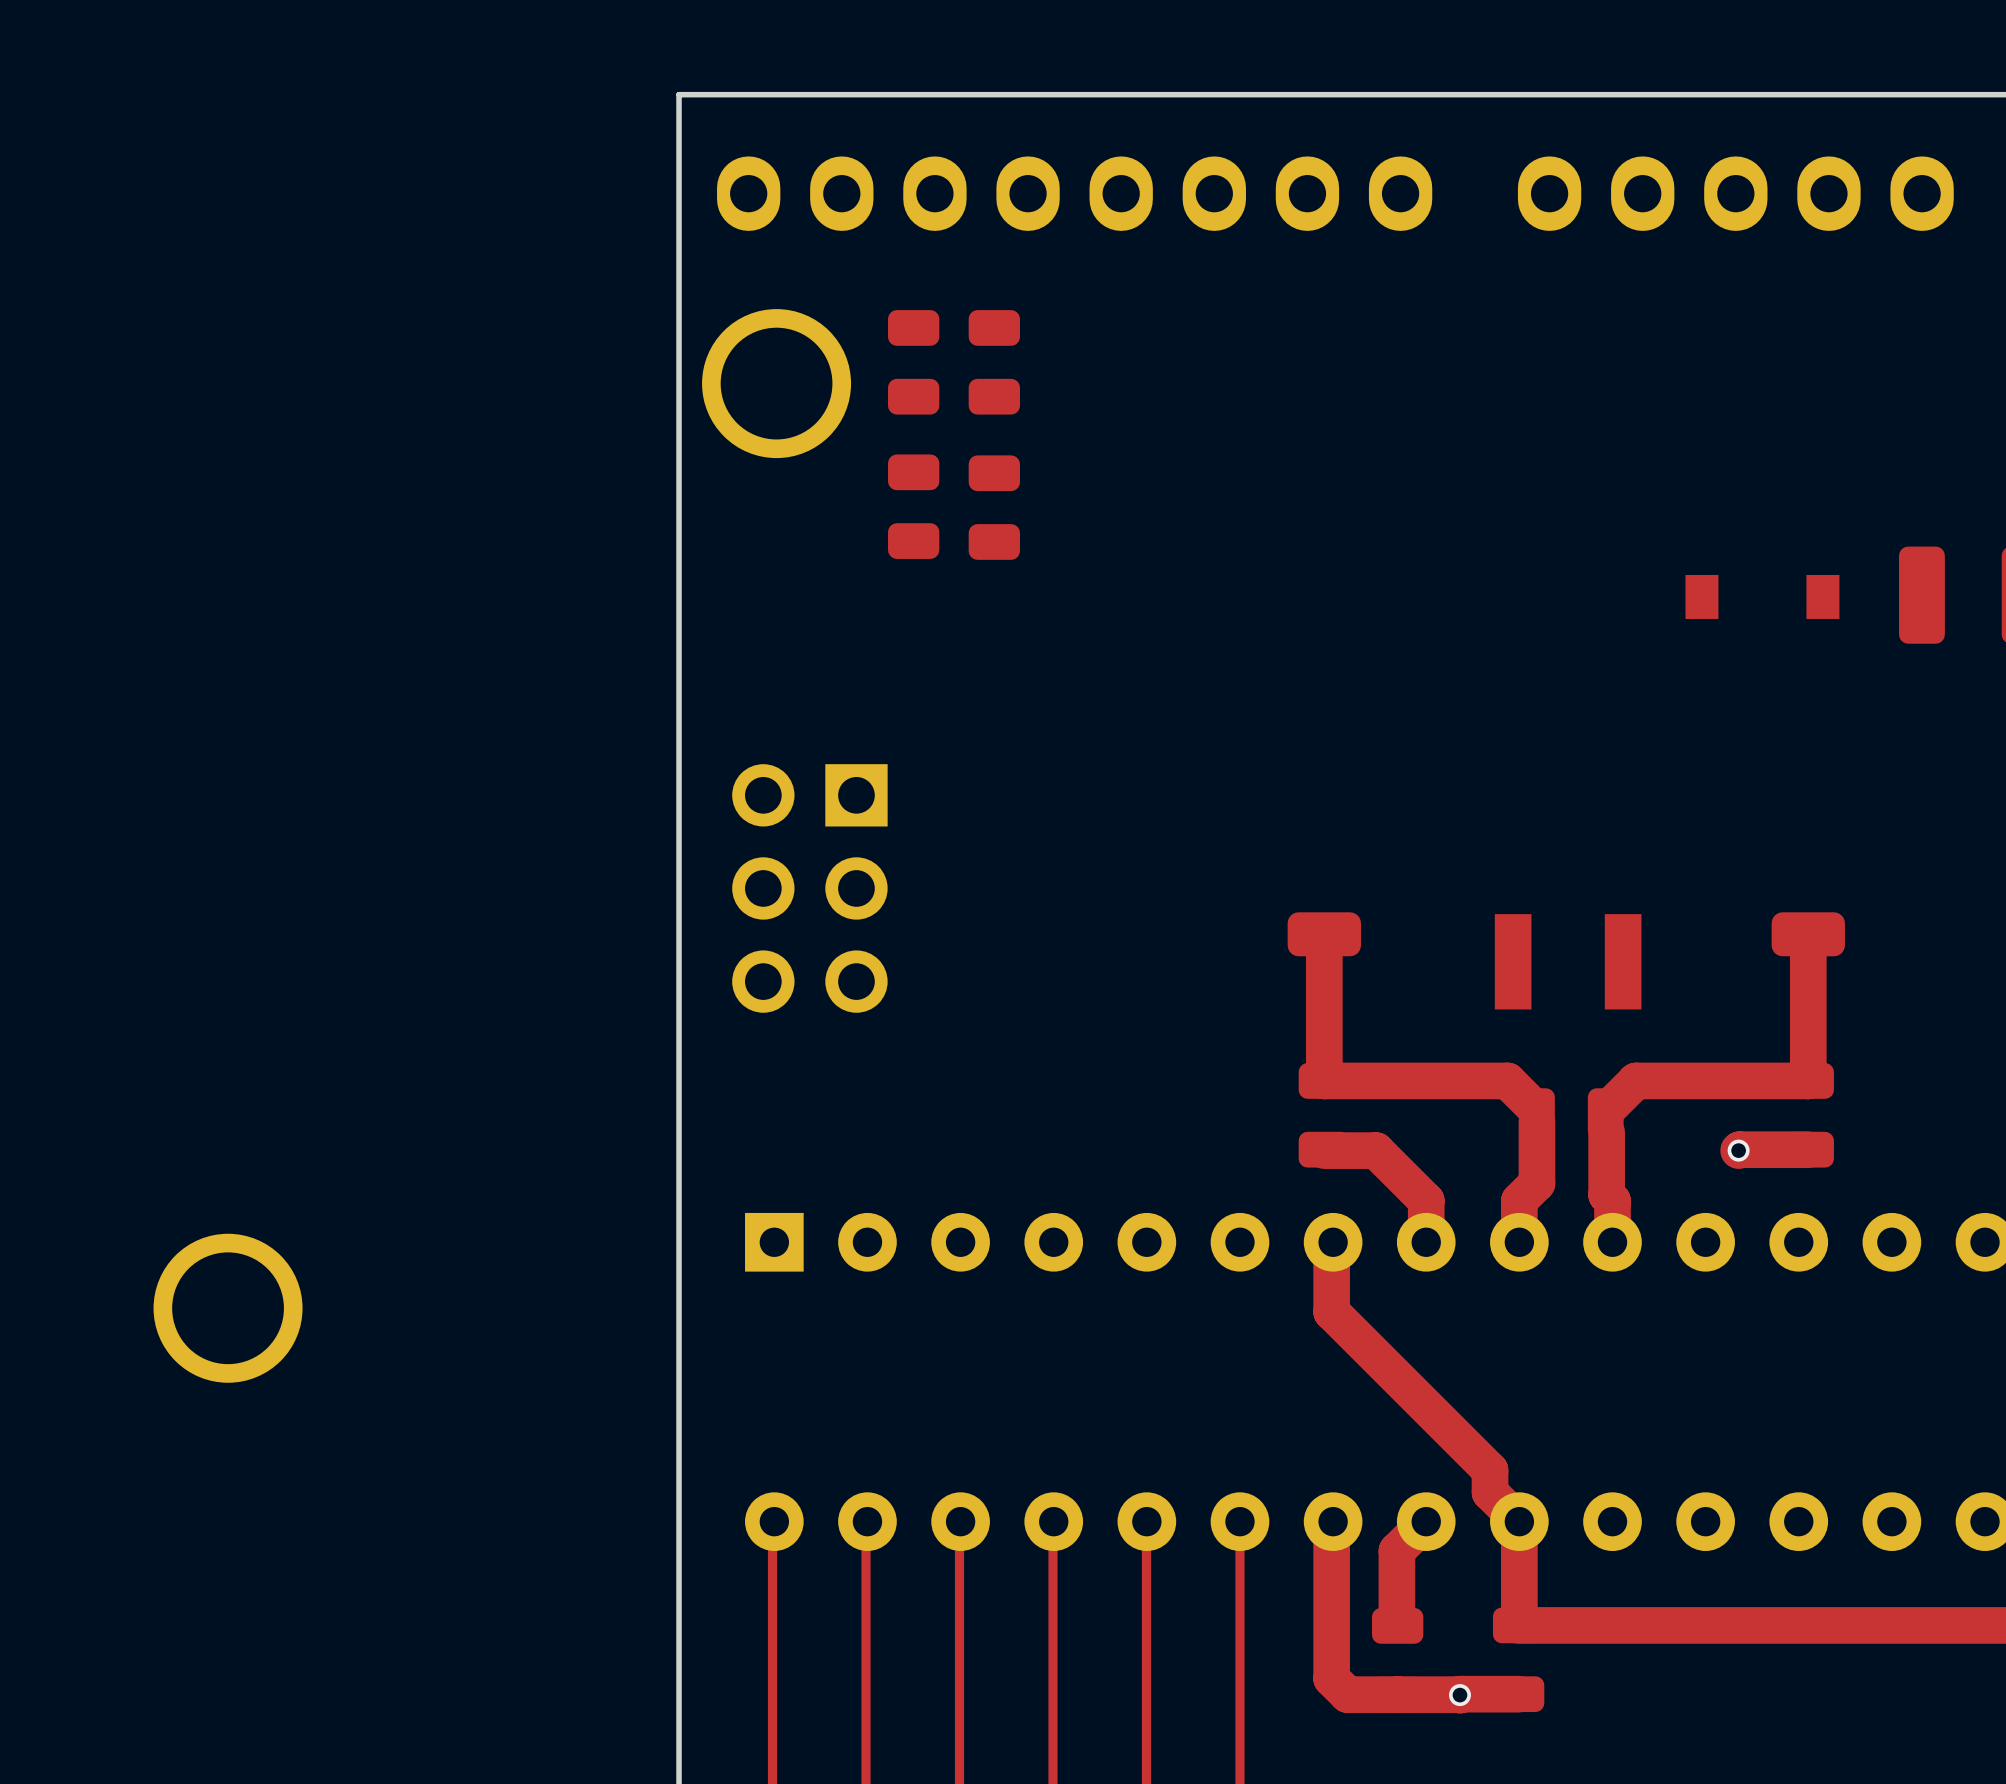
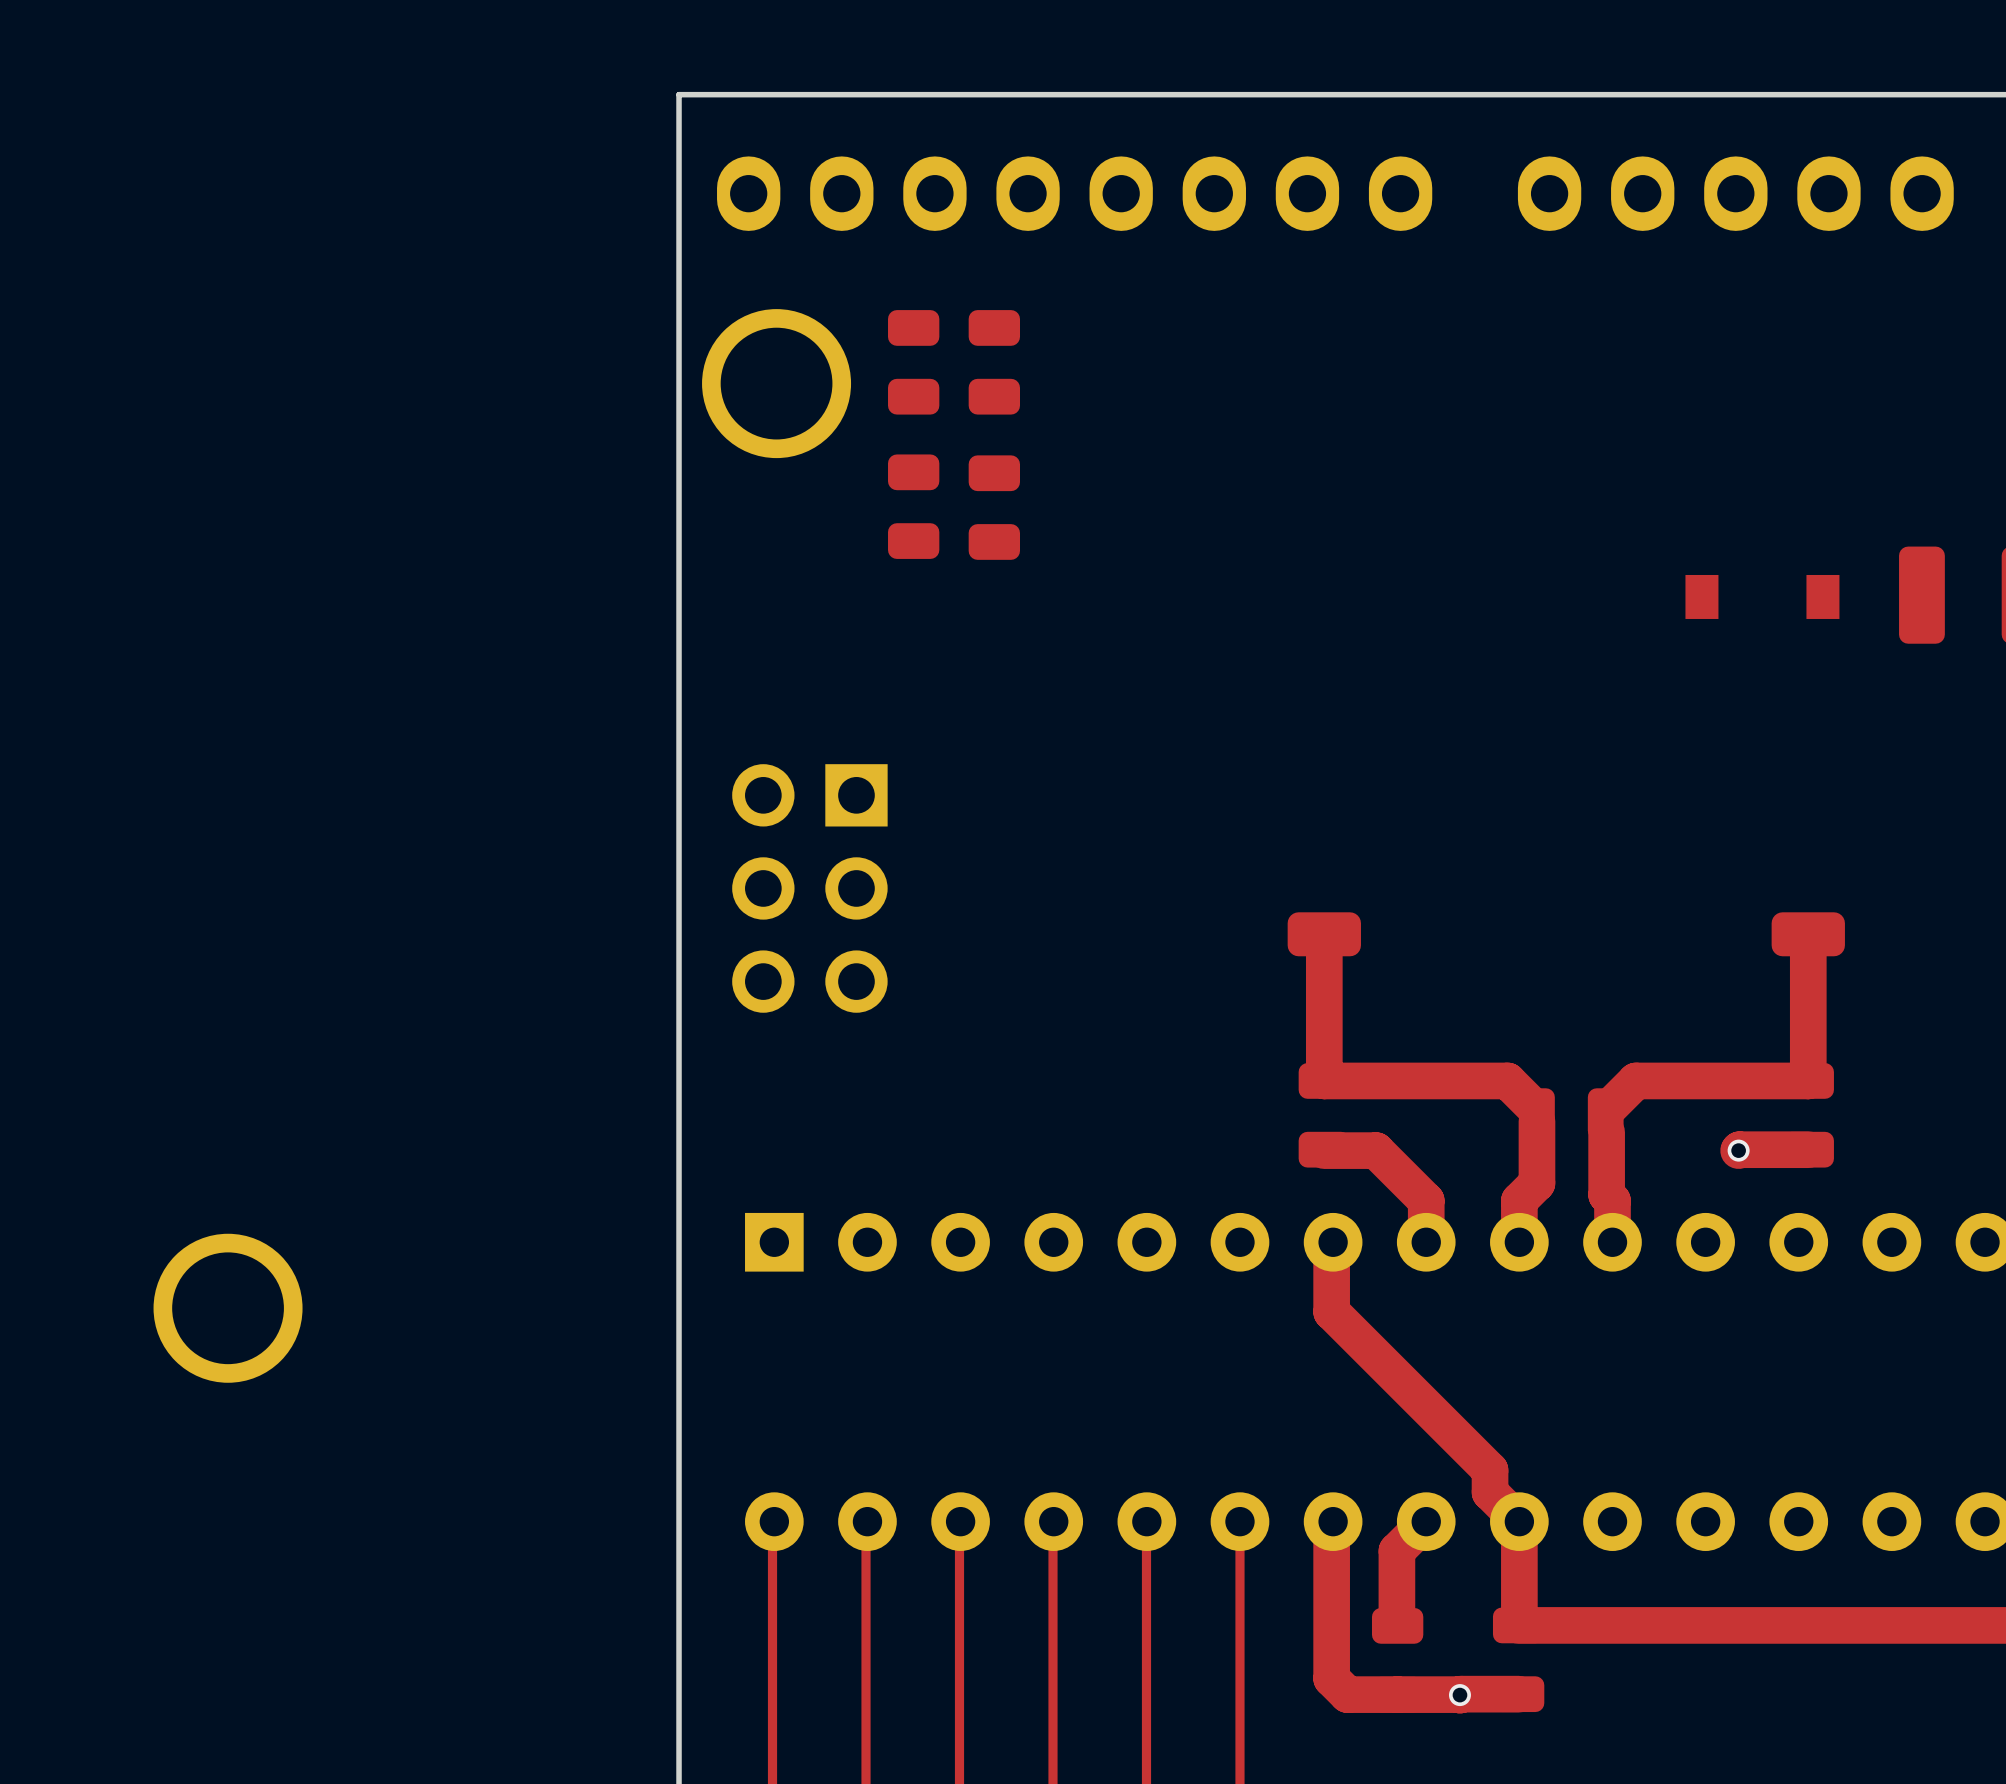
part: (1568, 961) -> none

